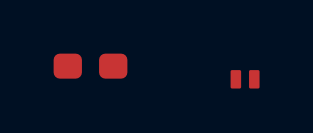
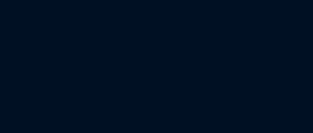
part: (90, 66) -> none
part: (245, 79) -> none

